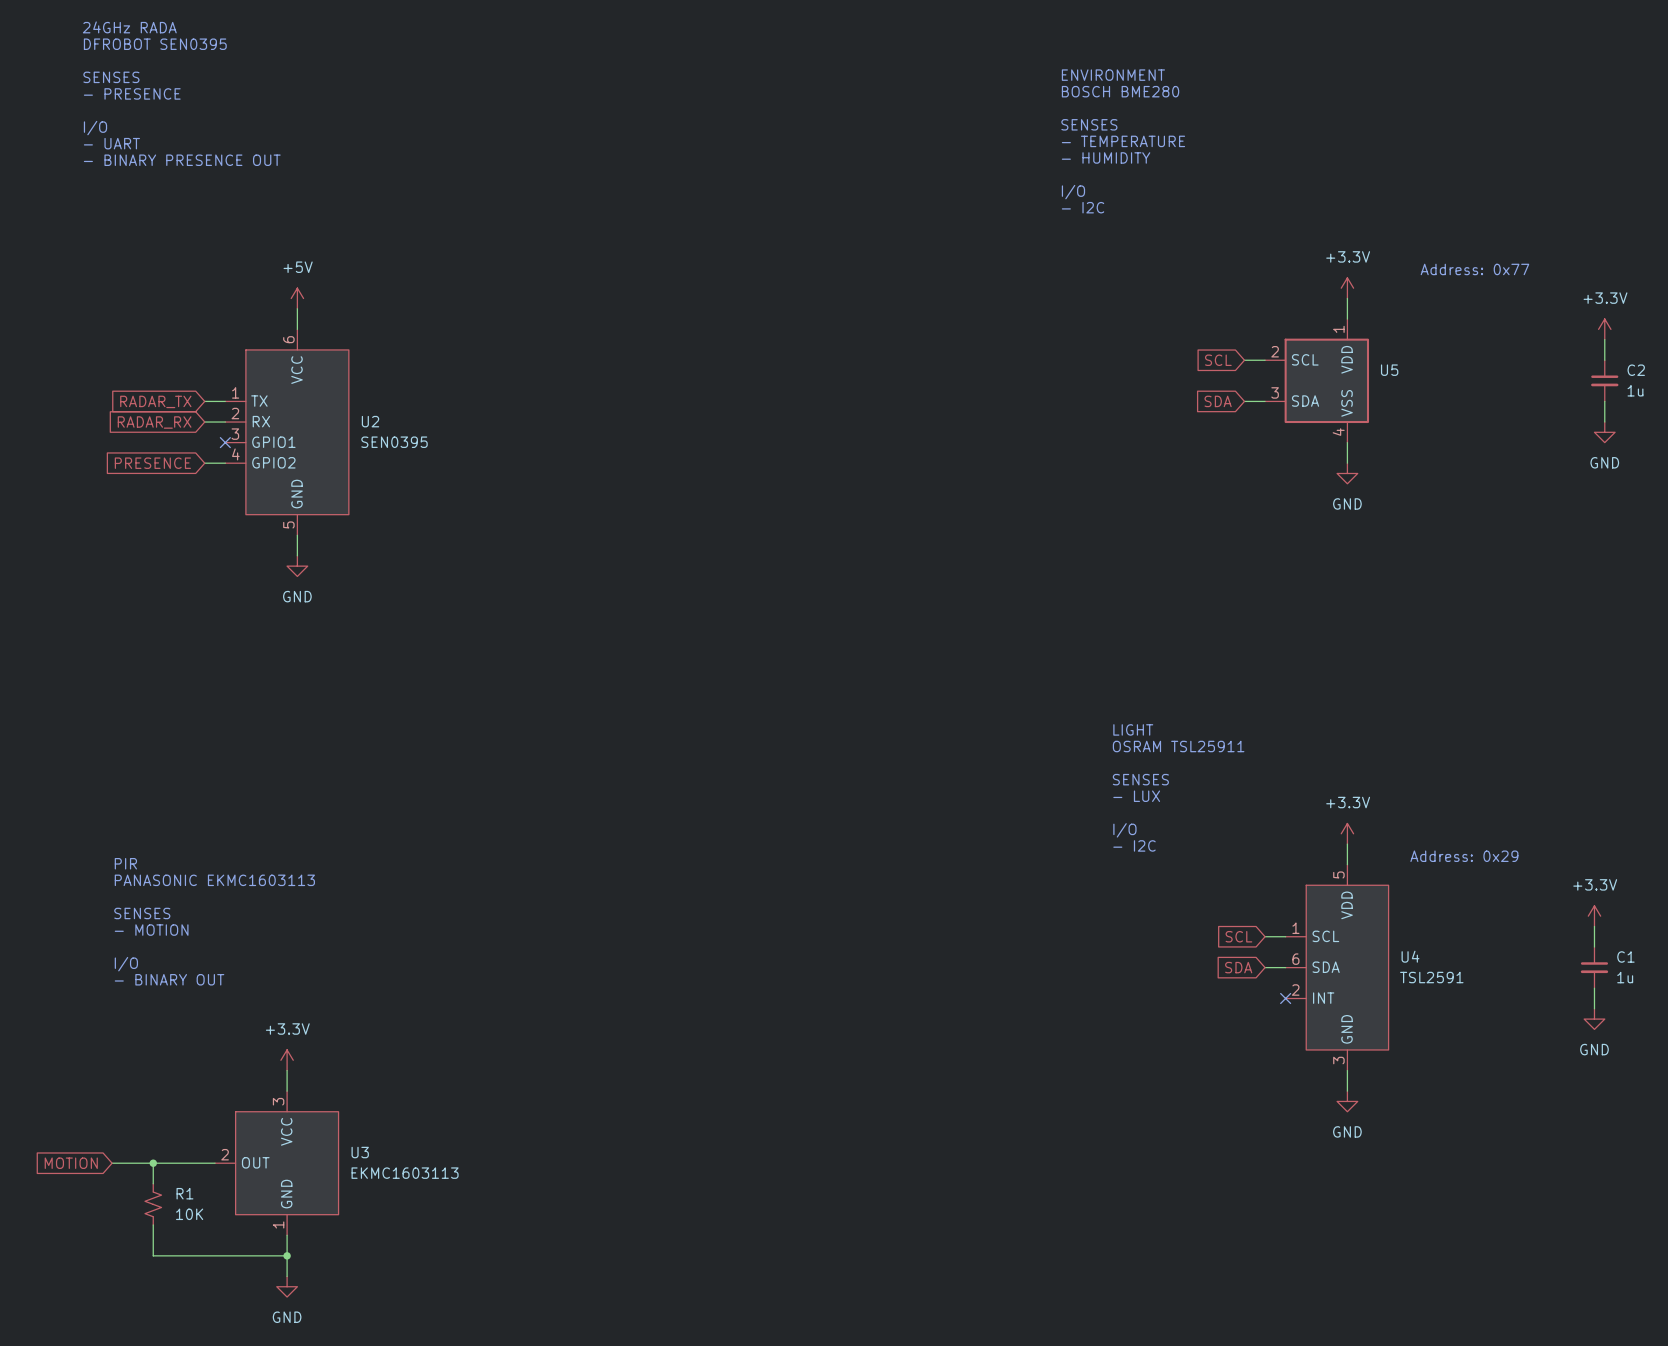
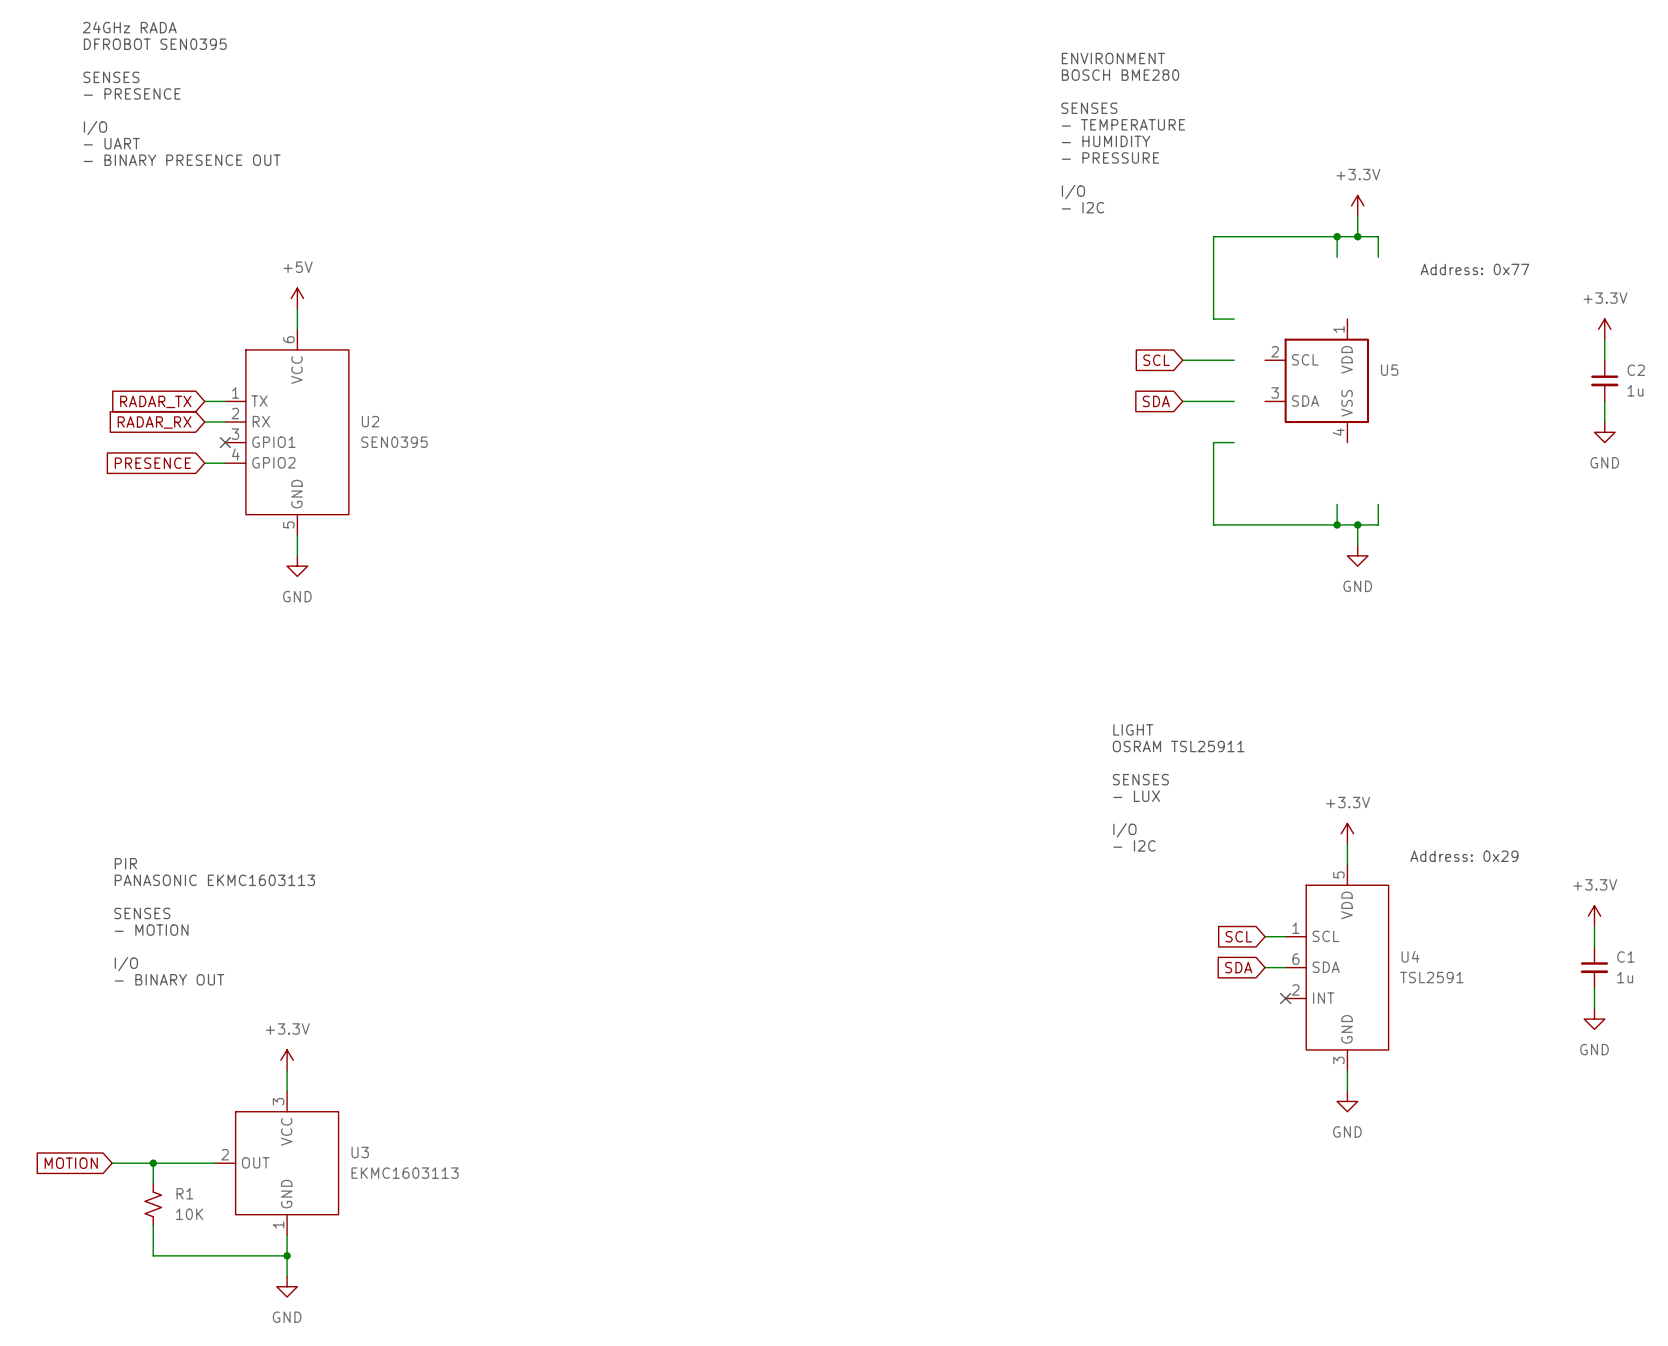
text: none -> ENVIRONMENT (1113, 58)
text: ENVIRONMENT (1113, 75) -> BOSCH BME280 (1120, 75)
text: BOSCH BME280 (1120, 91) -> none
text: none -> SENSES (1089, 108)
text: SENSES (1089, 124) -> - TEMPERATURE (1123, 124)
text: - TEMPERATURE (1123, 141) -> - HUMIDITY (1106, 141)
text: - HUMIDITY (1106, 157) -> - PRESSURE (1110, 157)
wire: none -> (1357, 216) (1357, 236)
junction: none -> (1337, 236)
junction: none -> (1357, 236)
wire: none -> (1378, 257) (1378, 236) (1213, 236) (1213, 319) (1234, 319)
power symbol position: +3.3V (1347, 288) -> +3.3V (1357, 205)
wire: (1347, 298) (1347, 319) -> (1337, 236) (1337, 257)
wire: none -> (1182, 360) (1234, 360)
global label position: SCL (1218, 360) -> SCL (1156, 360)
wire: (1244, 360) (1265, 360) -> none
wire: none -> (1182, 401) (1234, 401)
global label position: SDA (1218, 401) -> SDA (1156, 401)
wire: (1244, 401) (1265, 401) -> none
wire: none -> (1234, 442) (1213, 442) (1213, 524) (1378, 524) (1378, 504)
wire: (1347, 442) (1347, 463) -> (1337, 504) (1337, 524)
power symbol position: GND (1347, 473) -> GND (1357, 555)
junction: none -> (1337, 524)
wire: none -> (1357, 524) (1357, 545)
junction: none -> (1357, 524)

